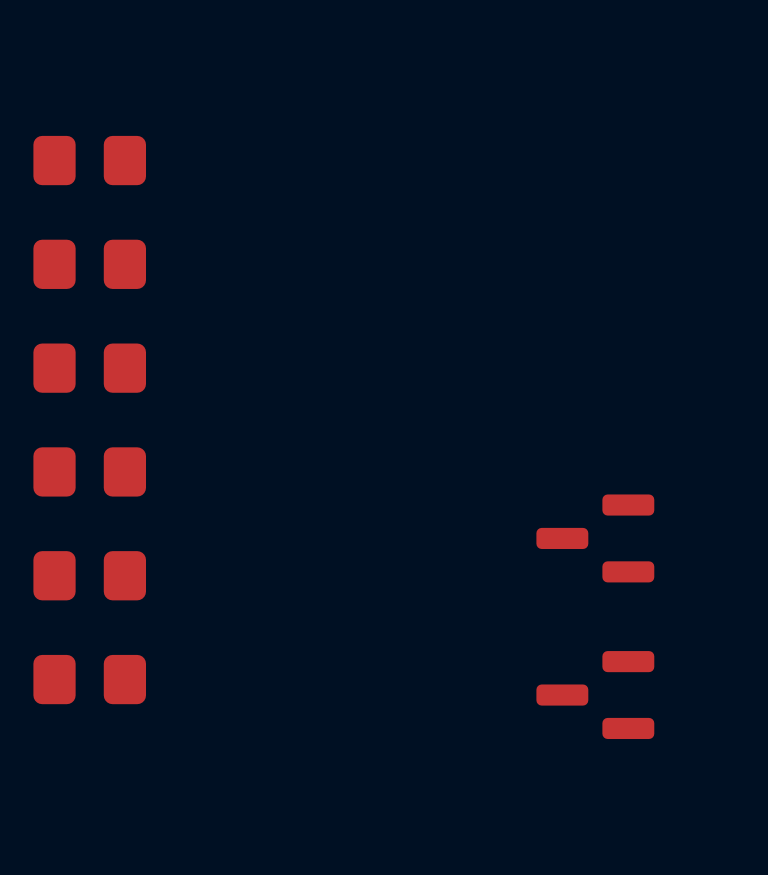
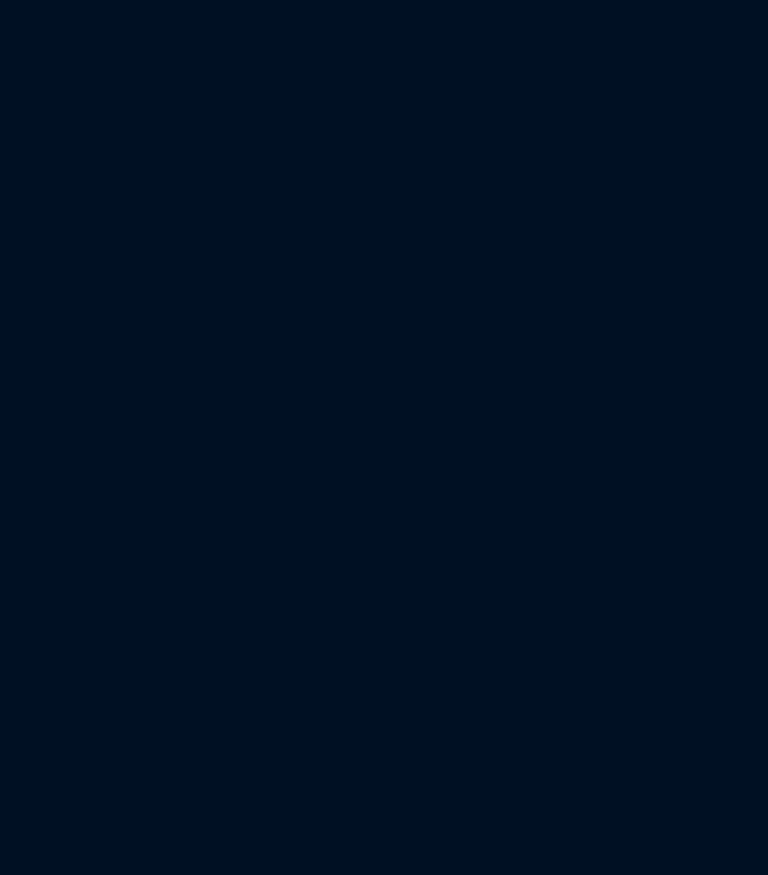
part: (89, 160) -> none
part: (89, 264) -> none
part: (89, 368) -> none
part: (89, 471) -> none
part: (595, 538) -> none
part: (89, 575) -> none
part: (89, 679) -> none
part: (595, 695) -> none

